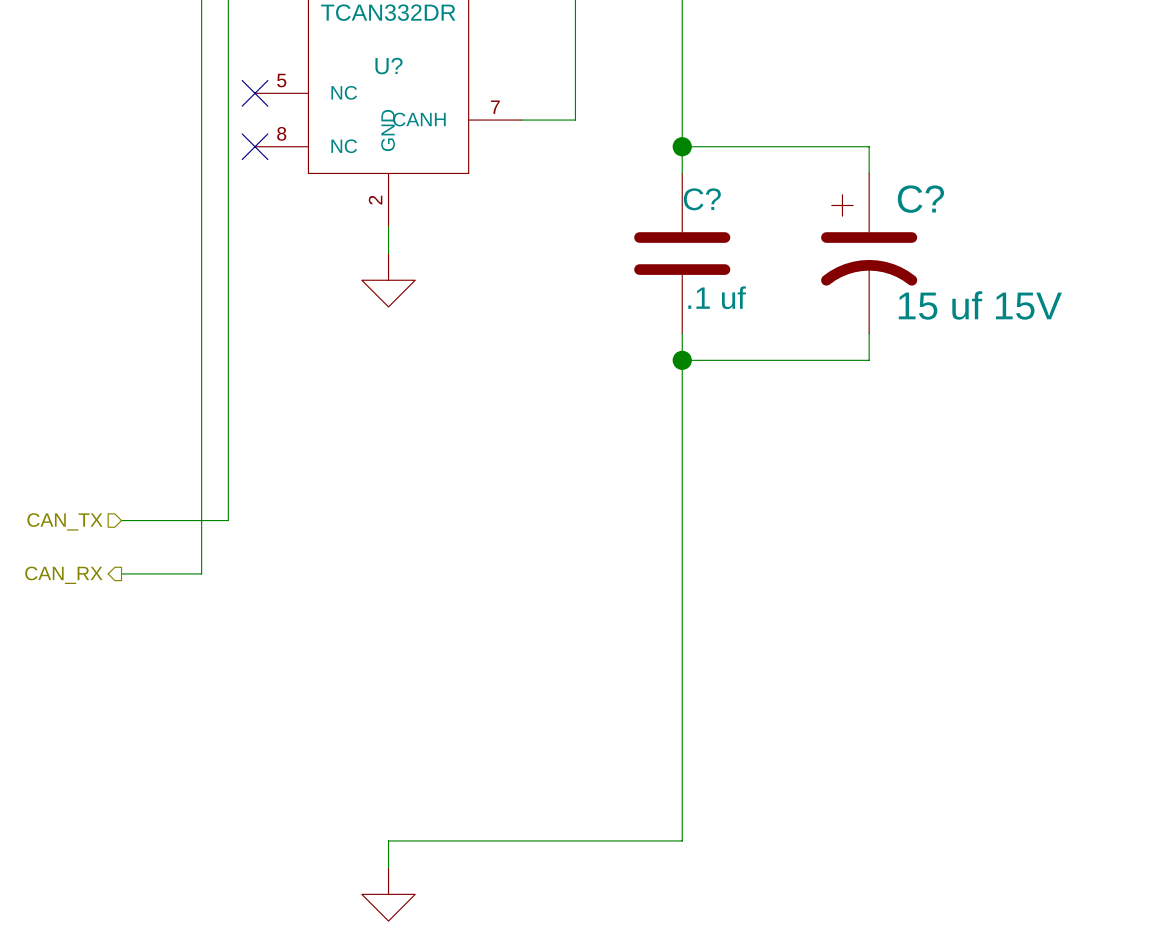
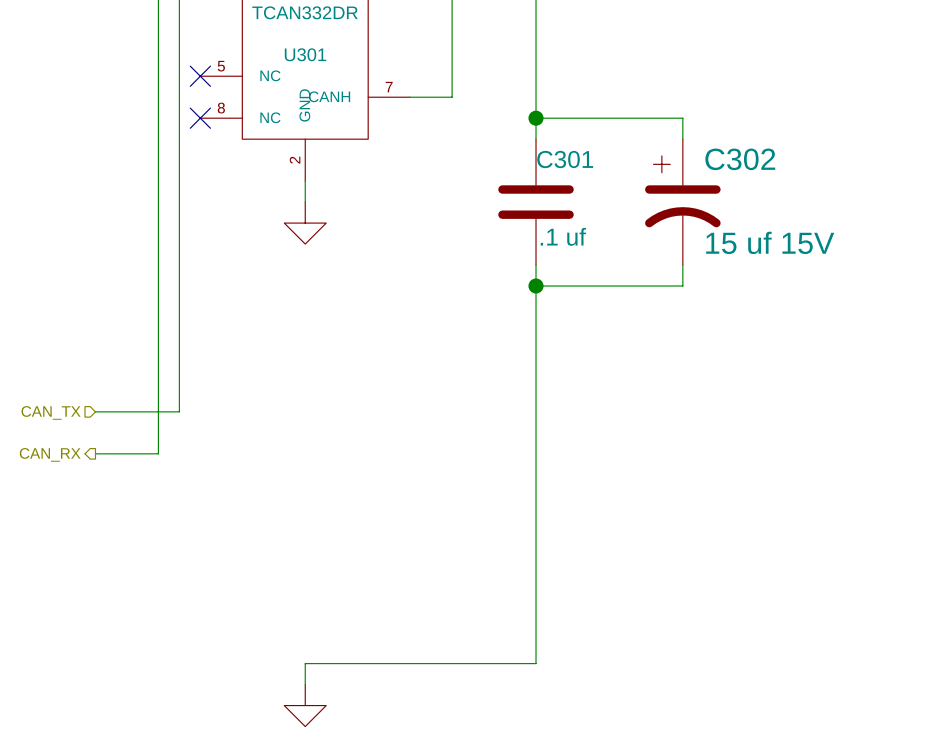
U? name: U? (389, 66) -> U301 (305, 54)
C? name: C? (702, 199) -> C301 (565, 159)
C? name: C? (920, 199) -> C302 (740, 159)

